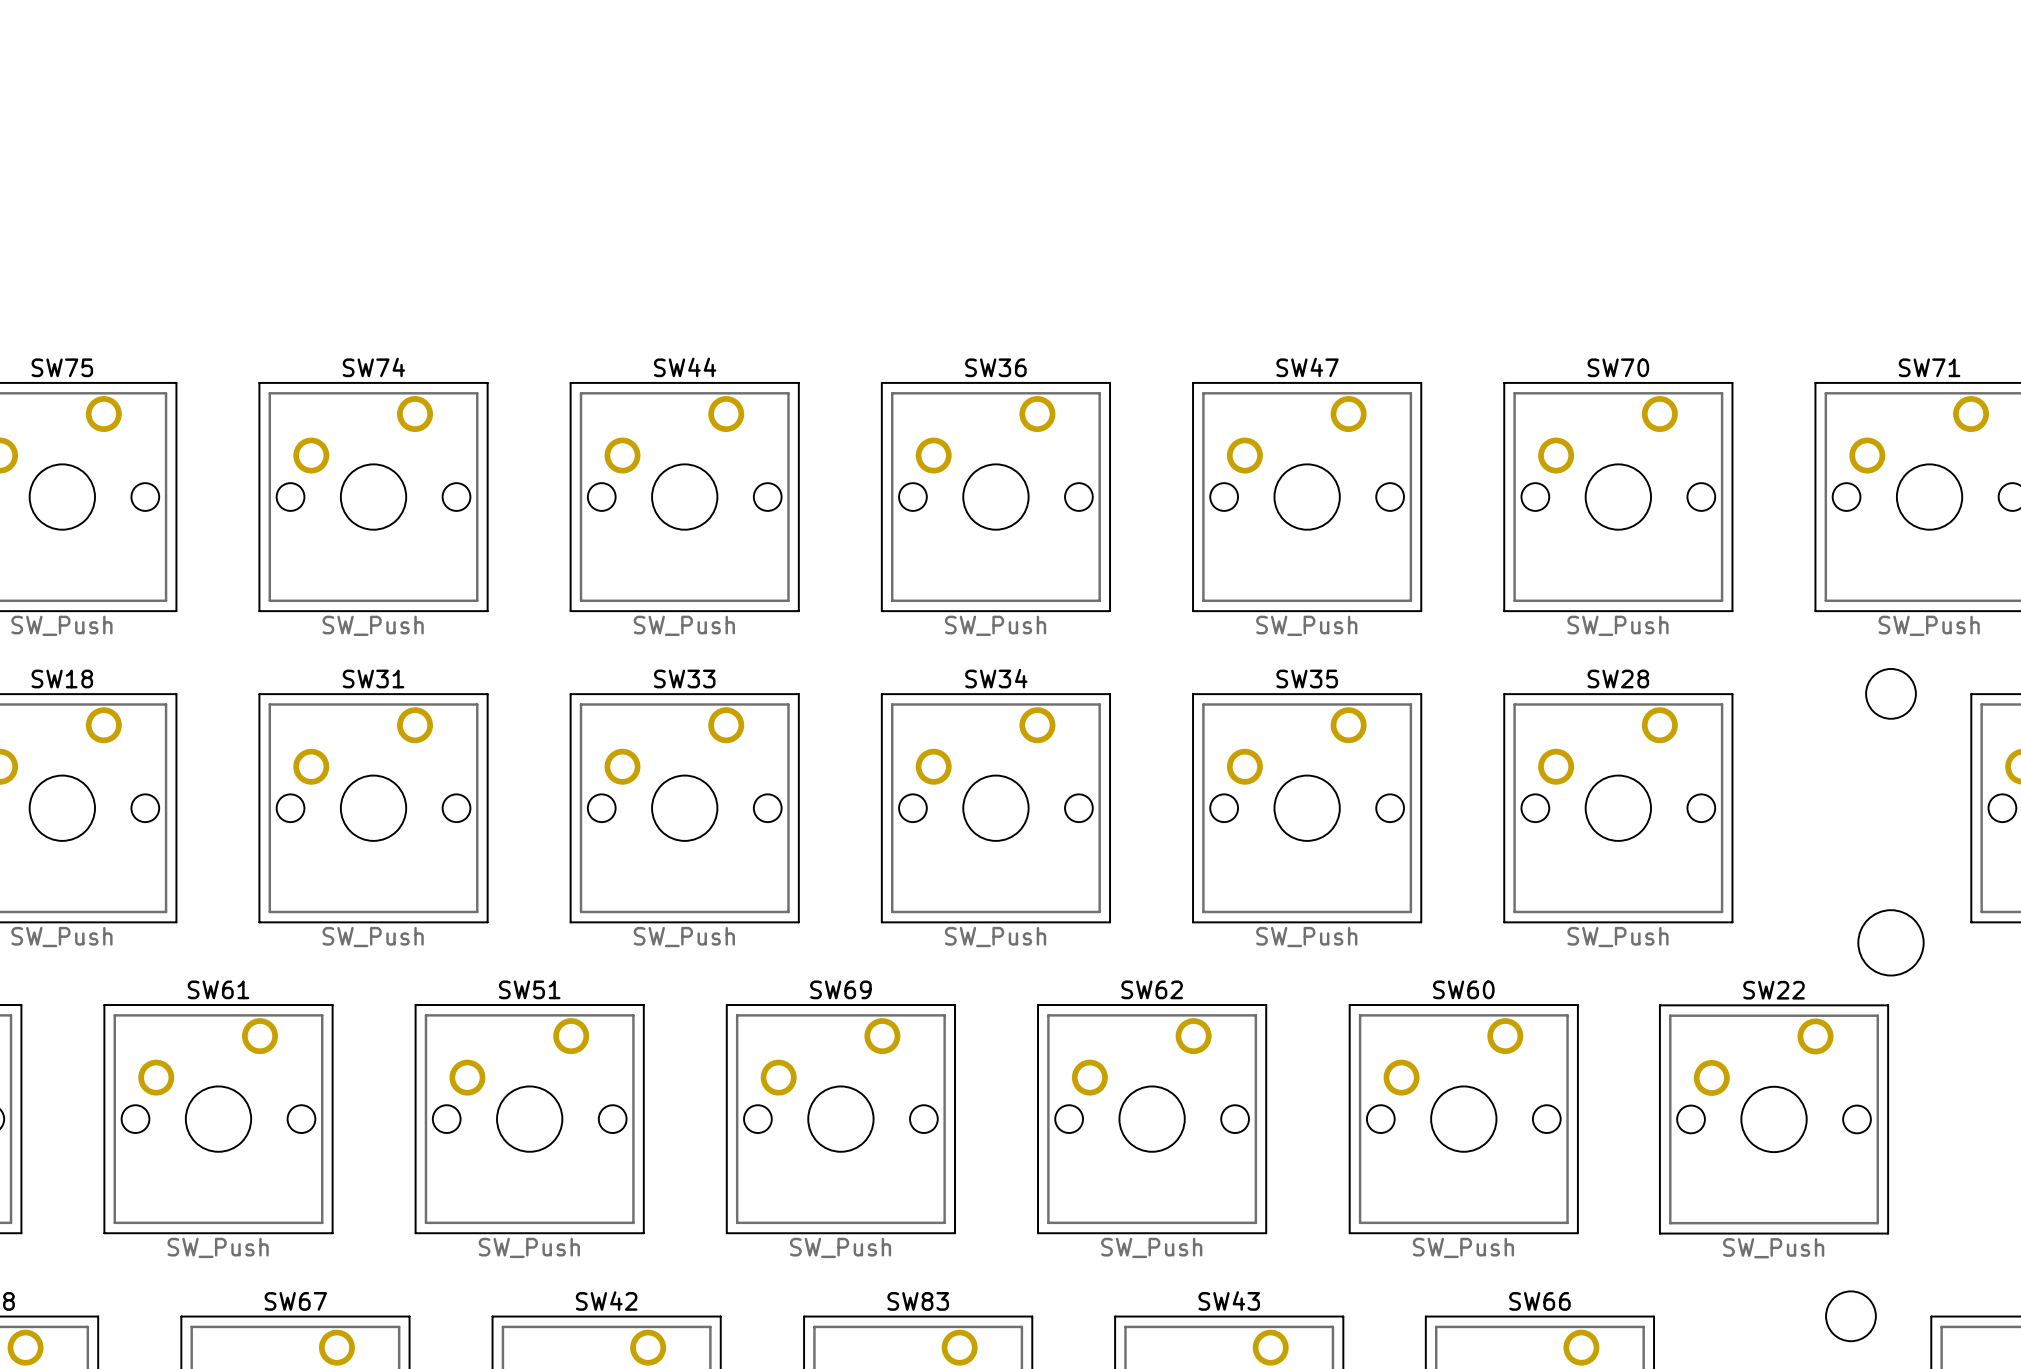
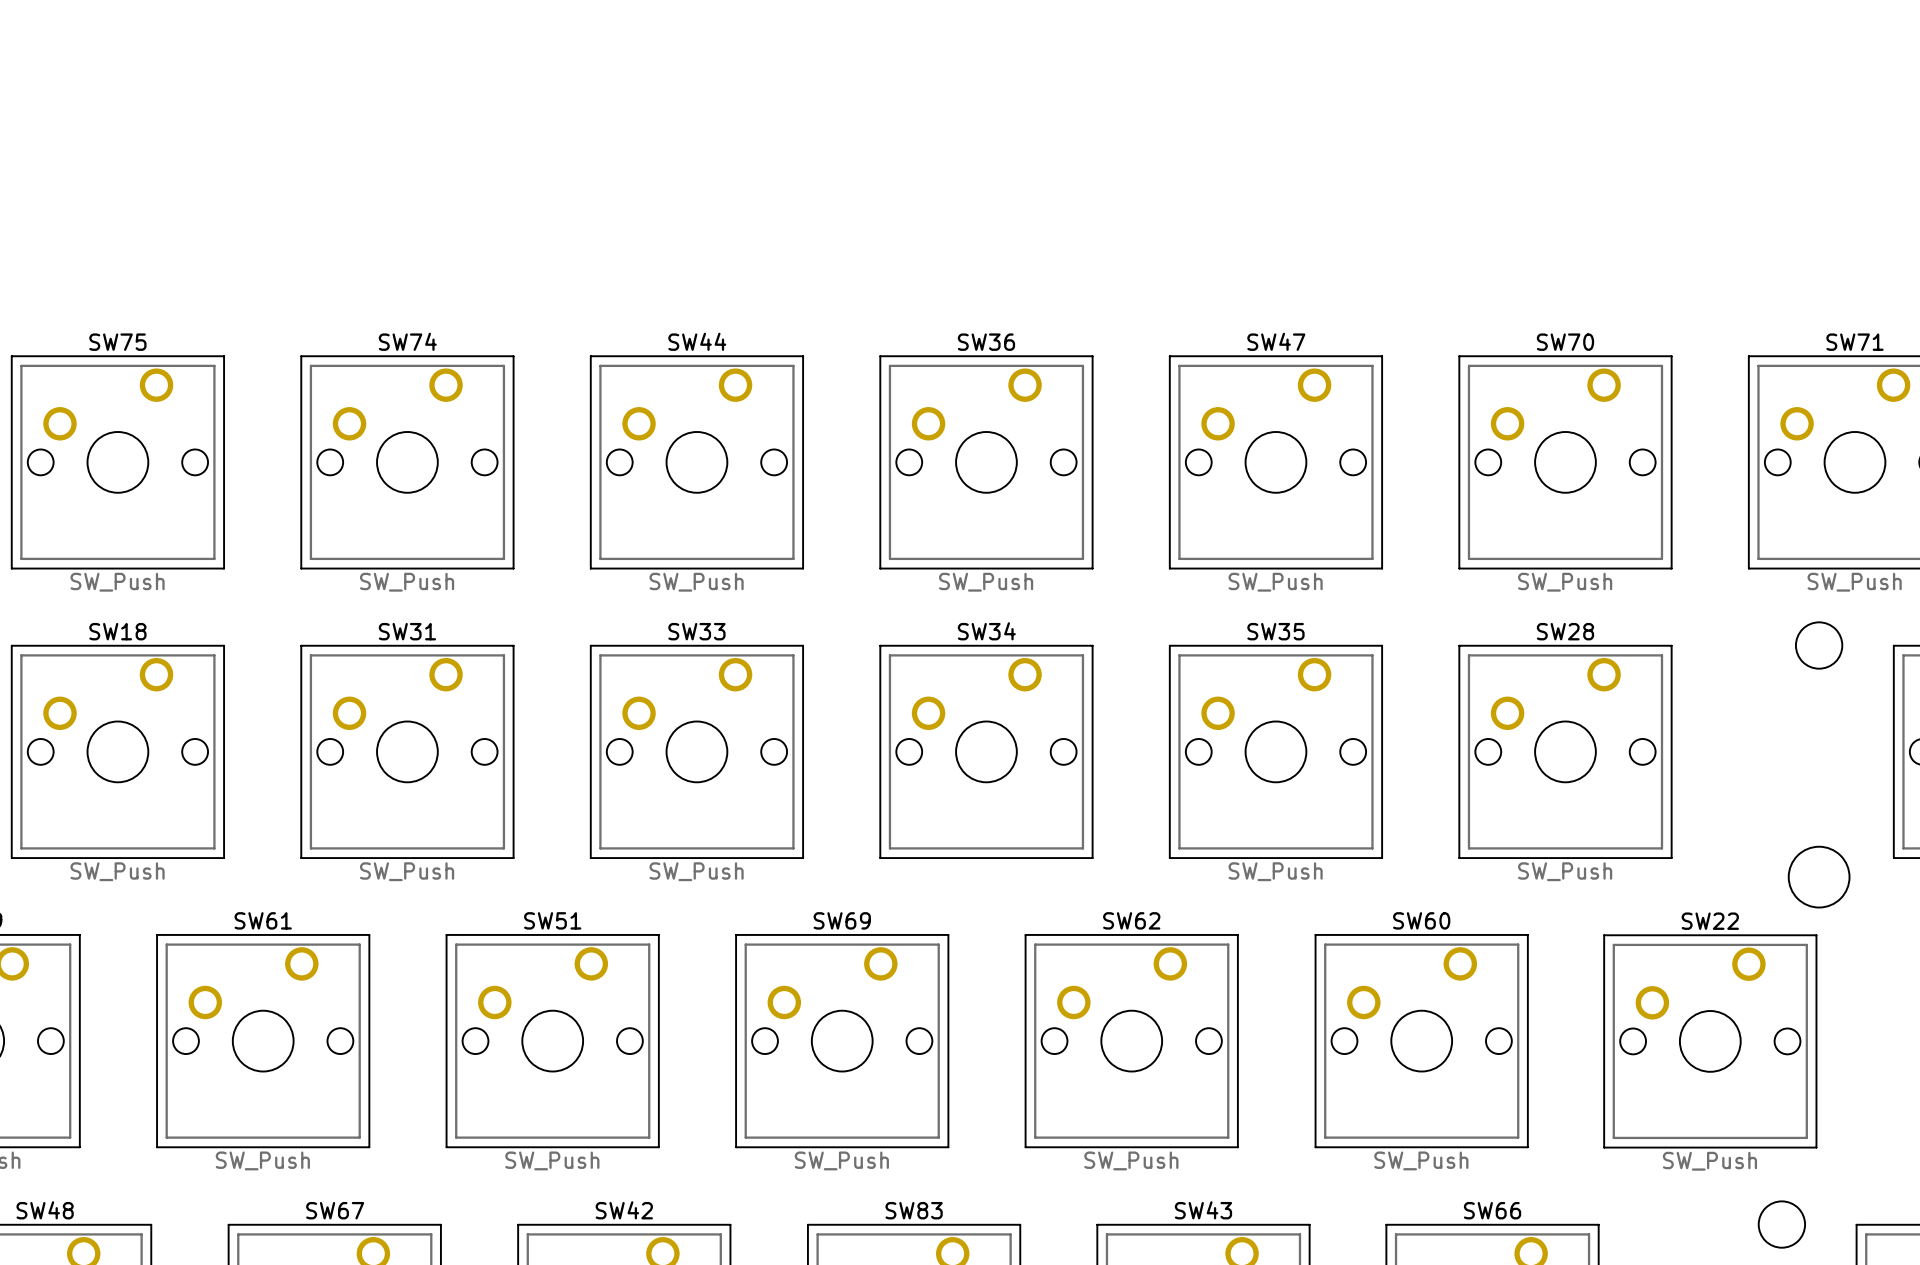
SW34 value: SW_Push (995, 937) -> none

